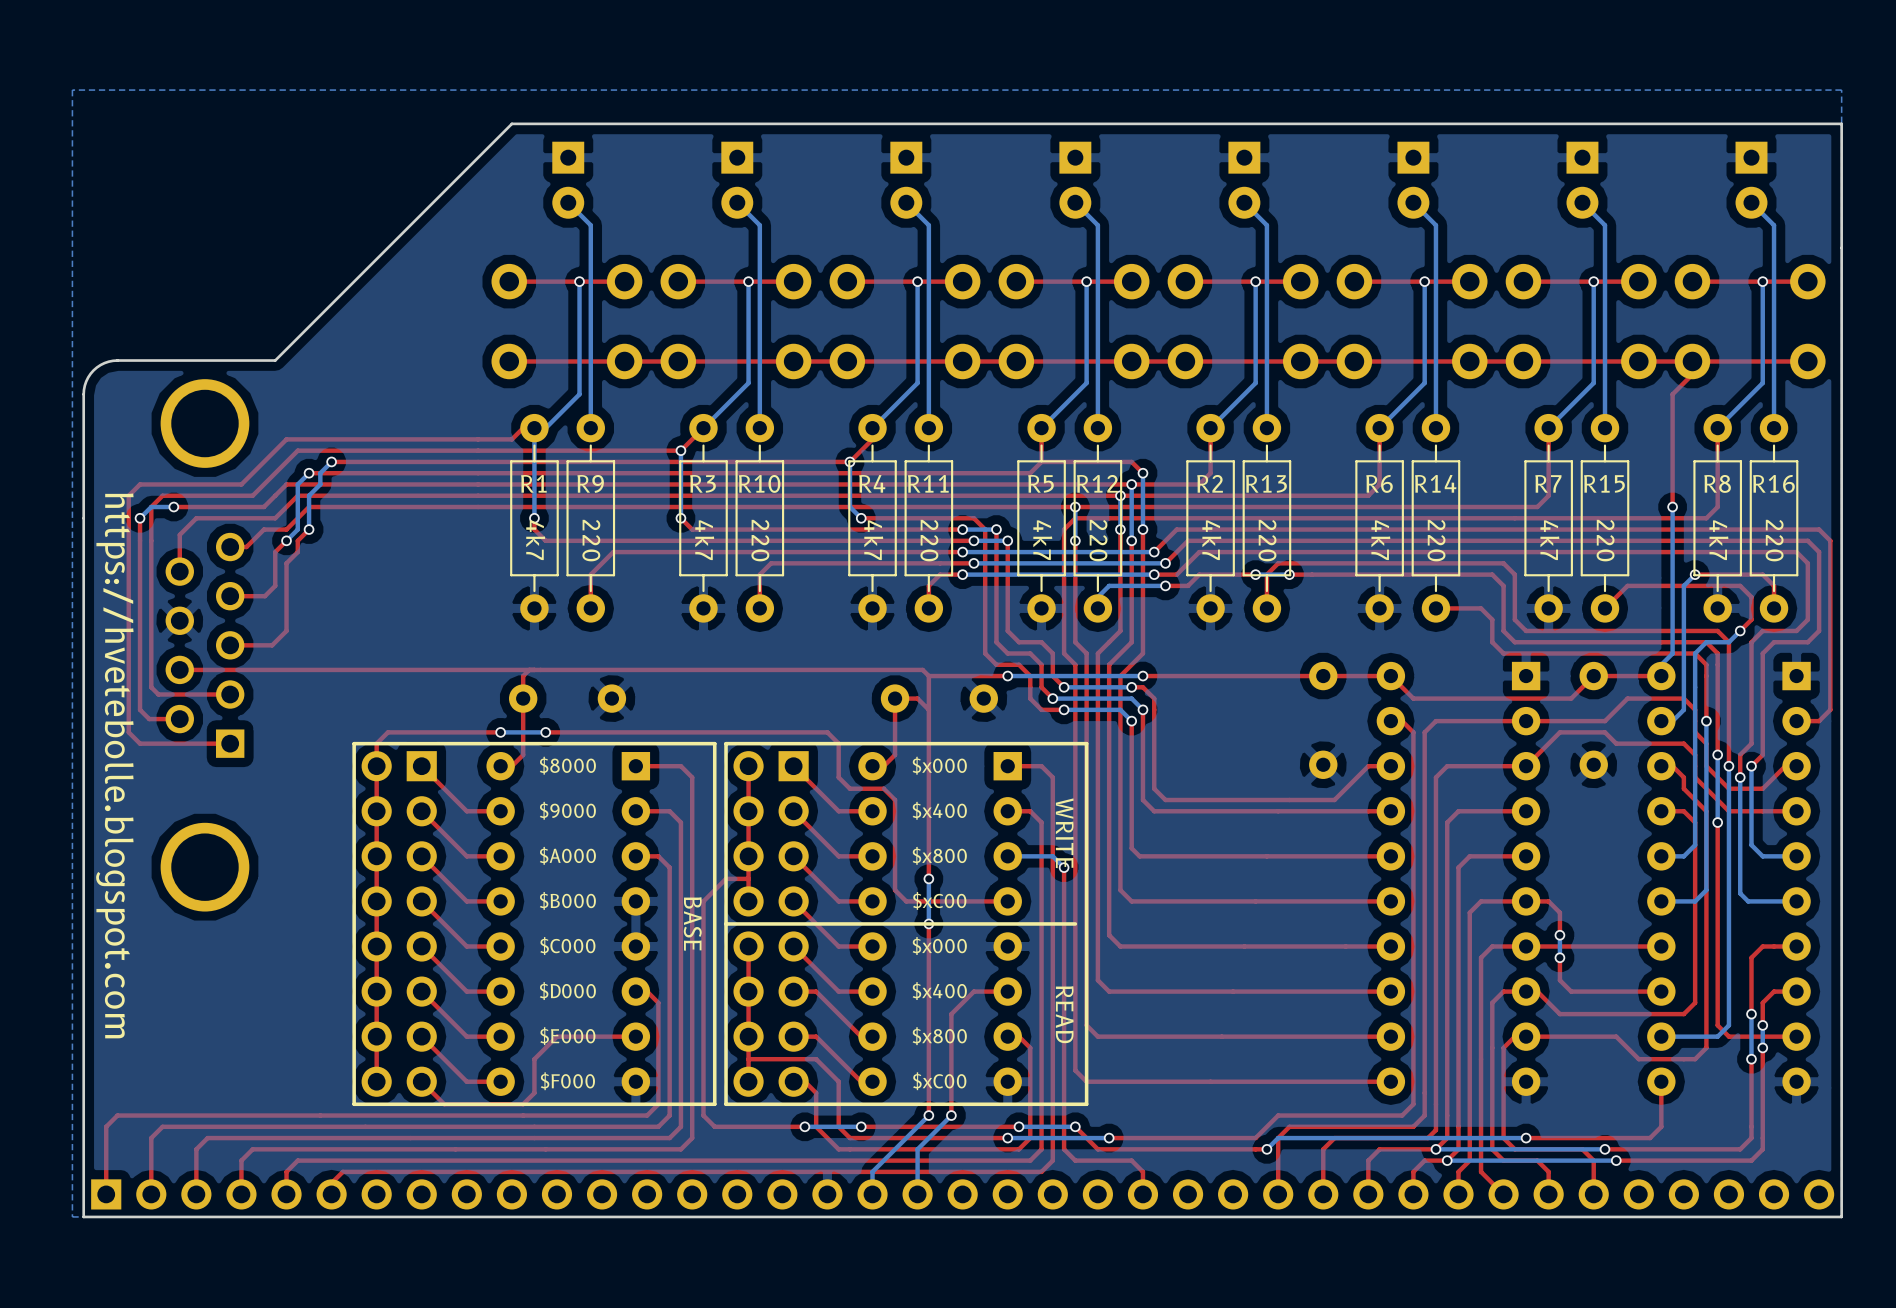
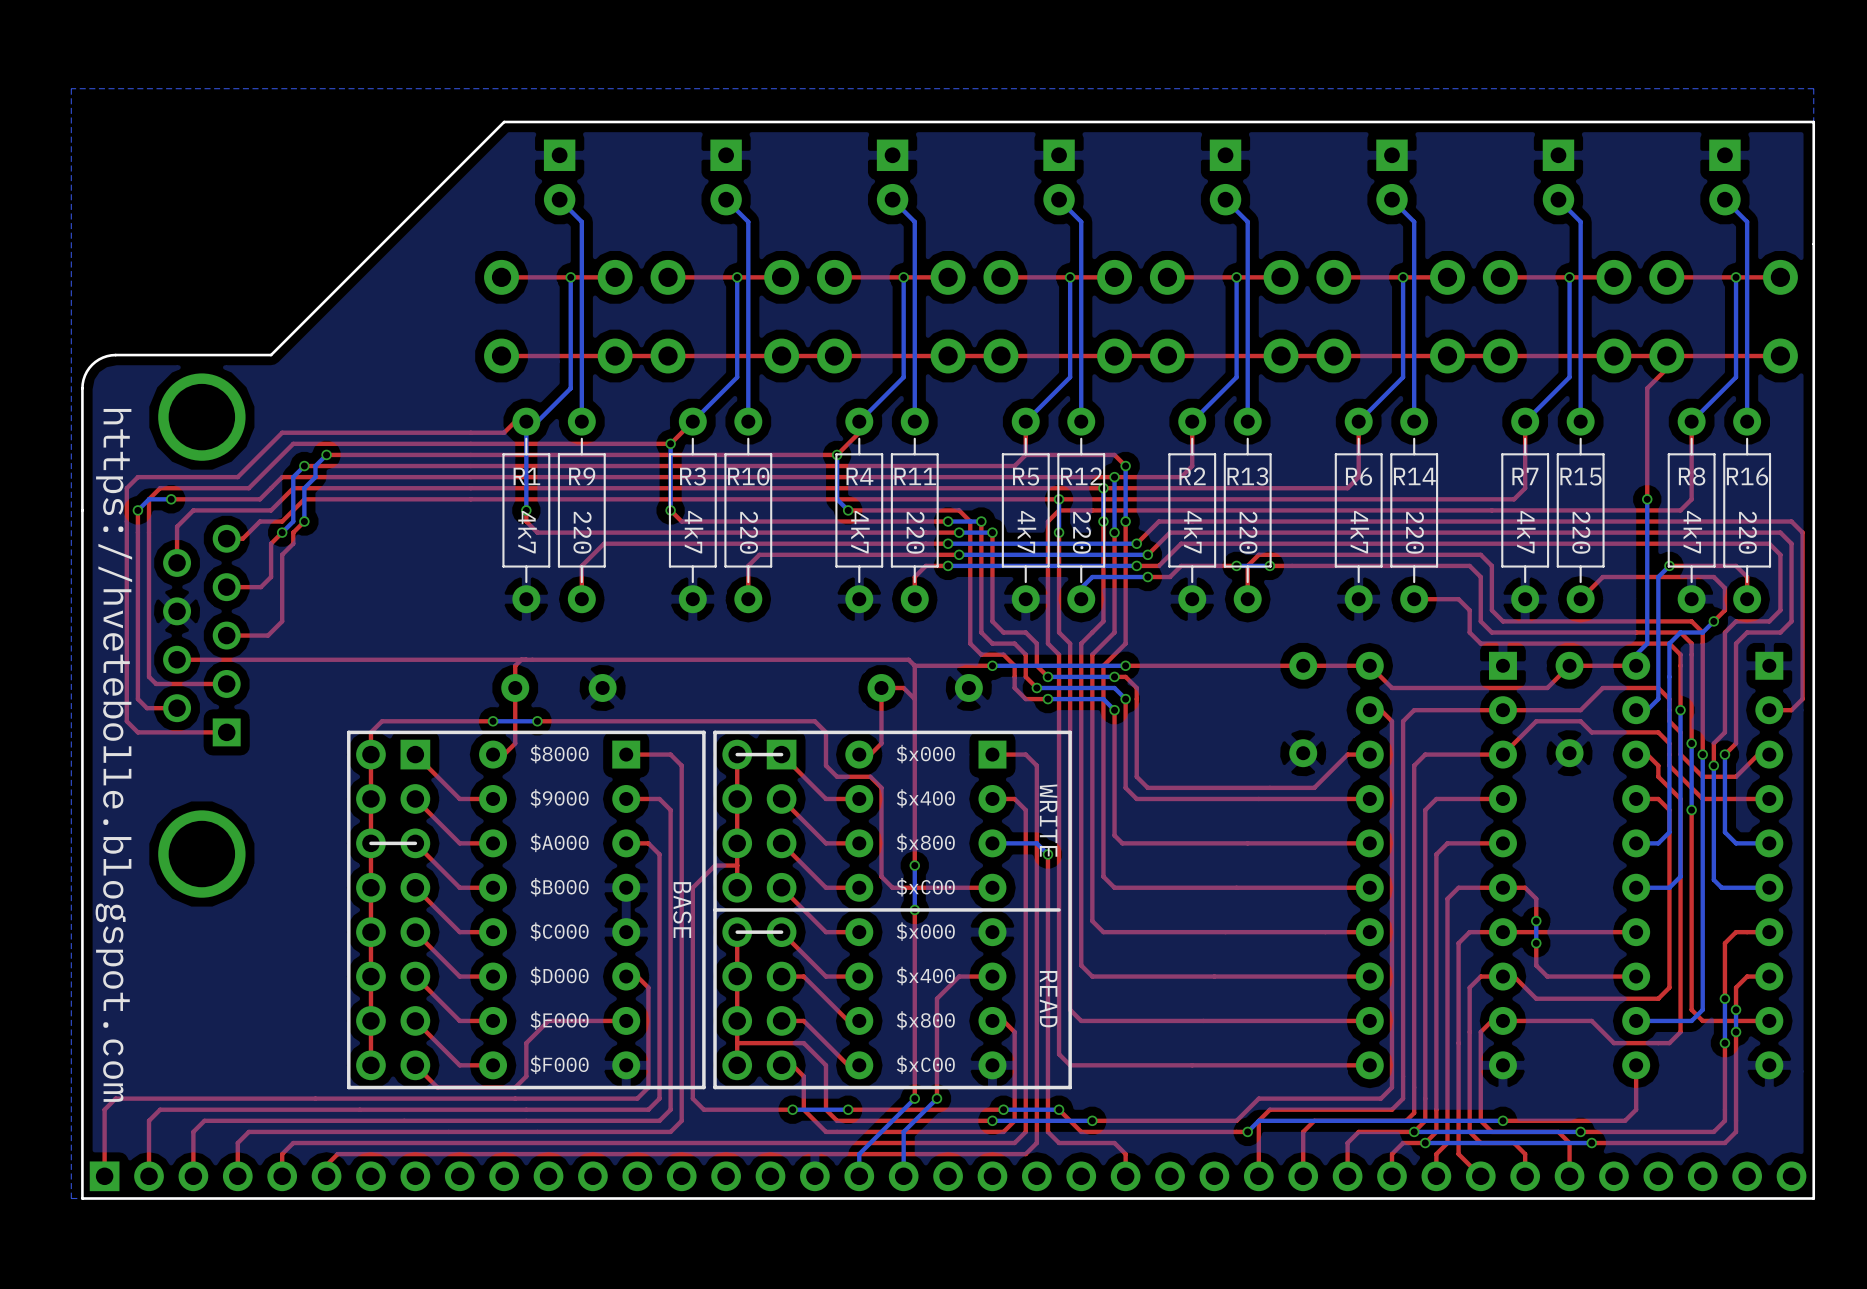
line: none -> (781, 754) (737, 754)
line: none -> (415, 843) (370, 843)
line: none -> (781, 932) (737, 932)

